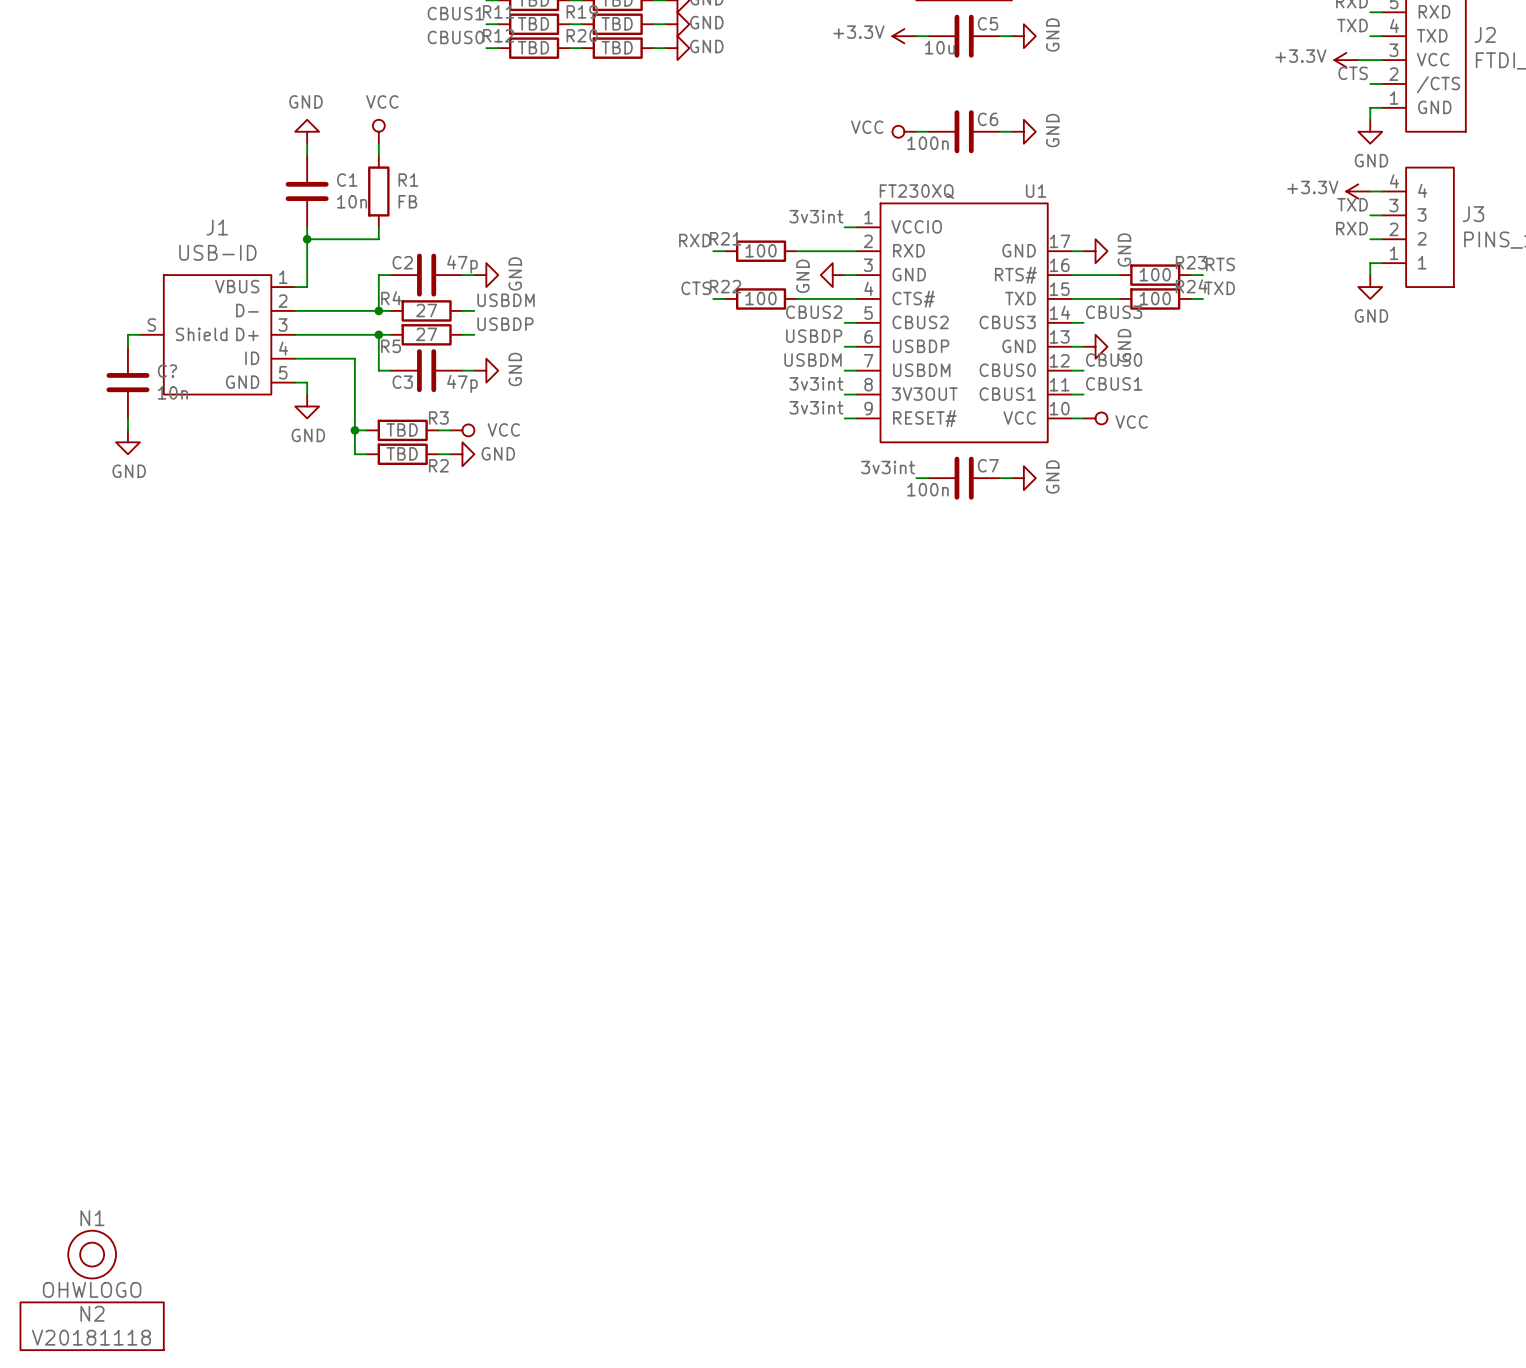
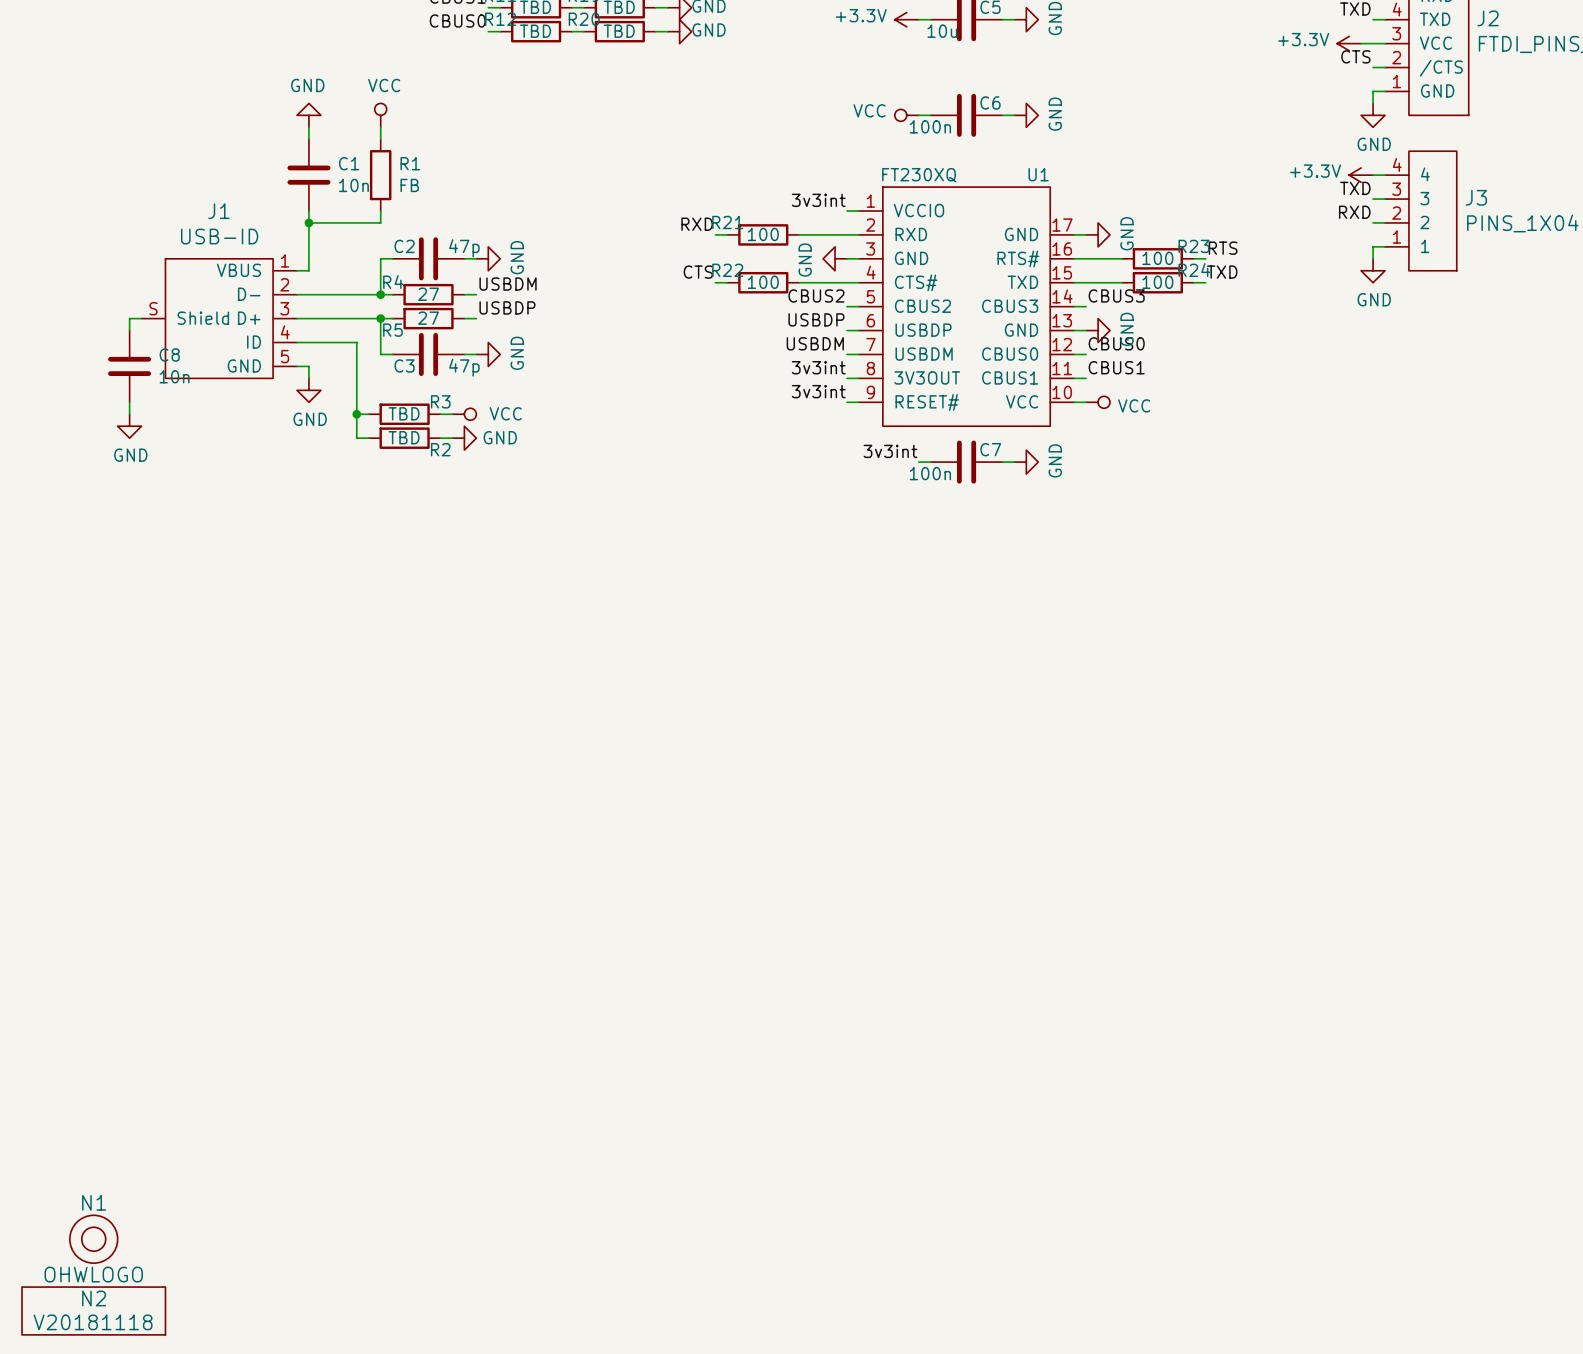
C? name: C? (167, 371) -> C8 (169, 354)

